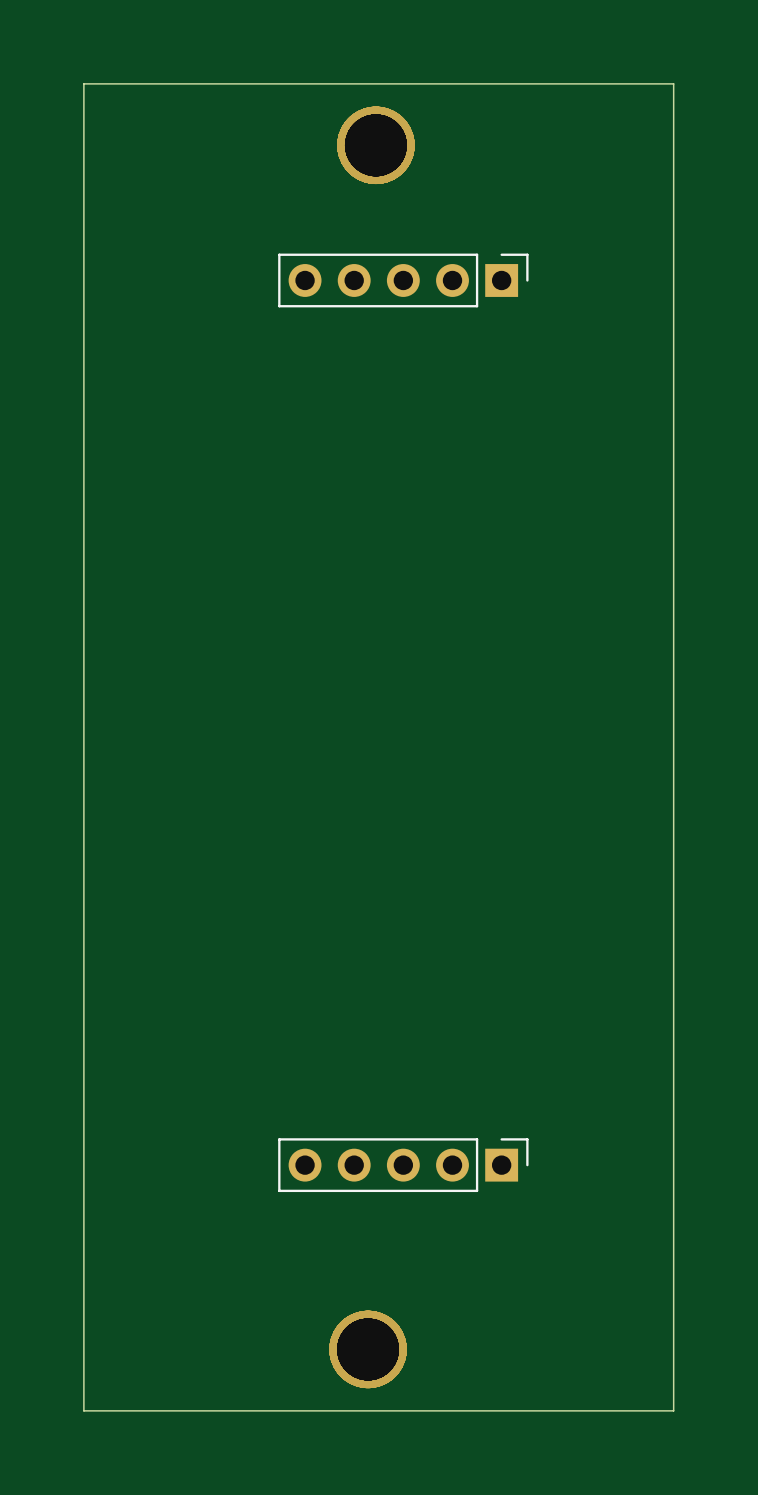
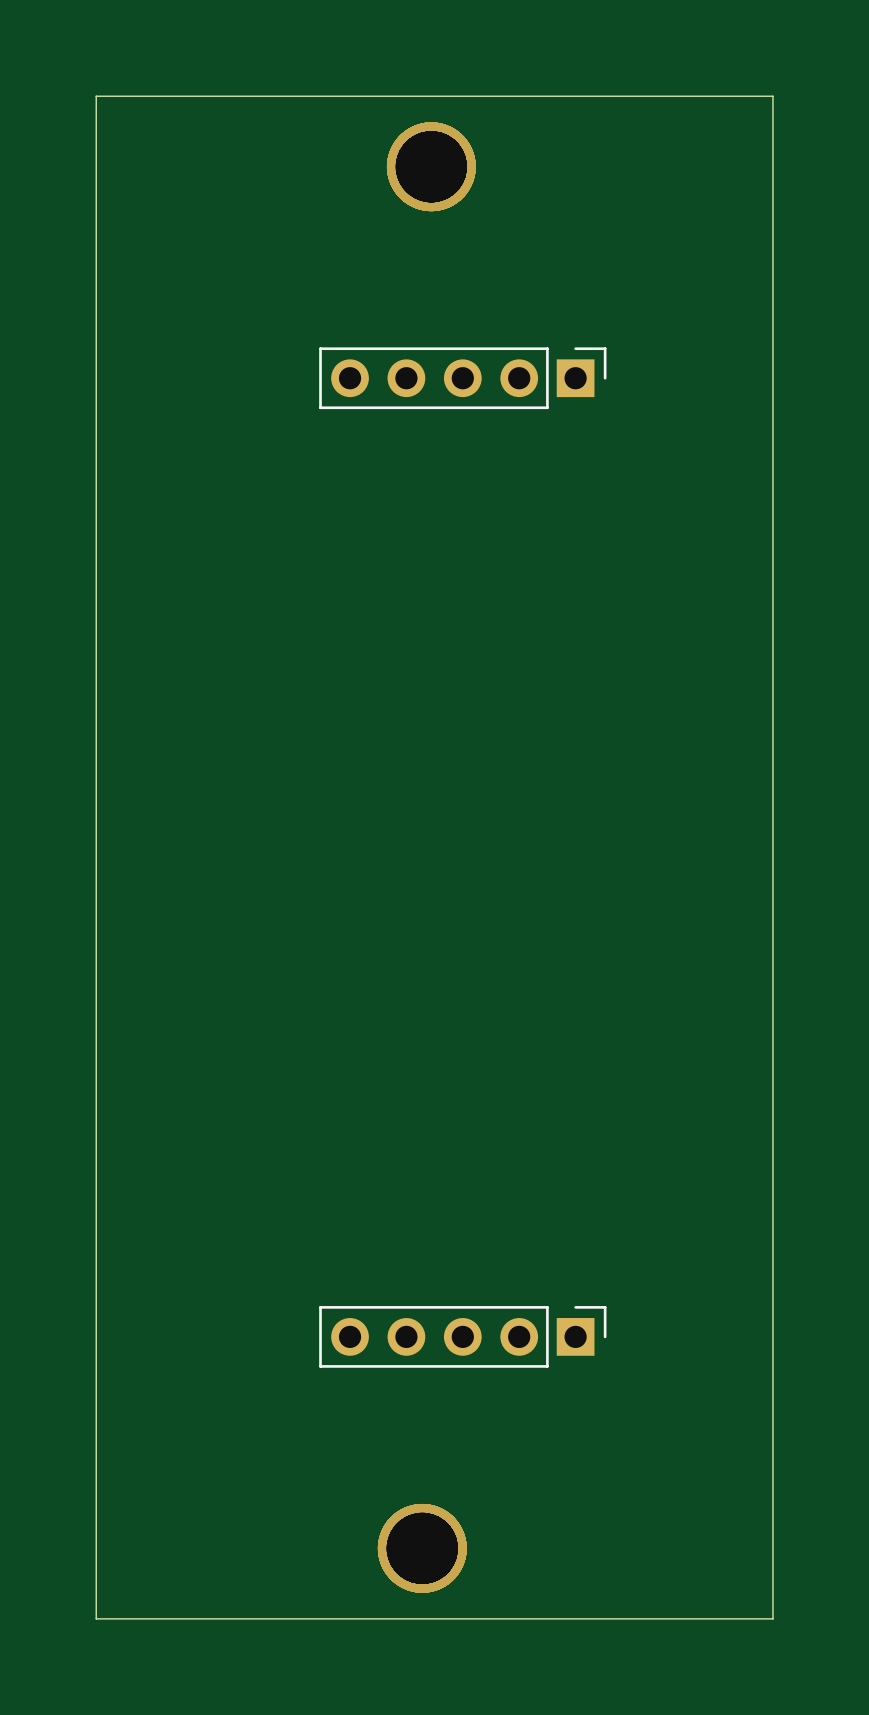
part position: (403, 280) -> (462, 378)

